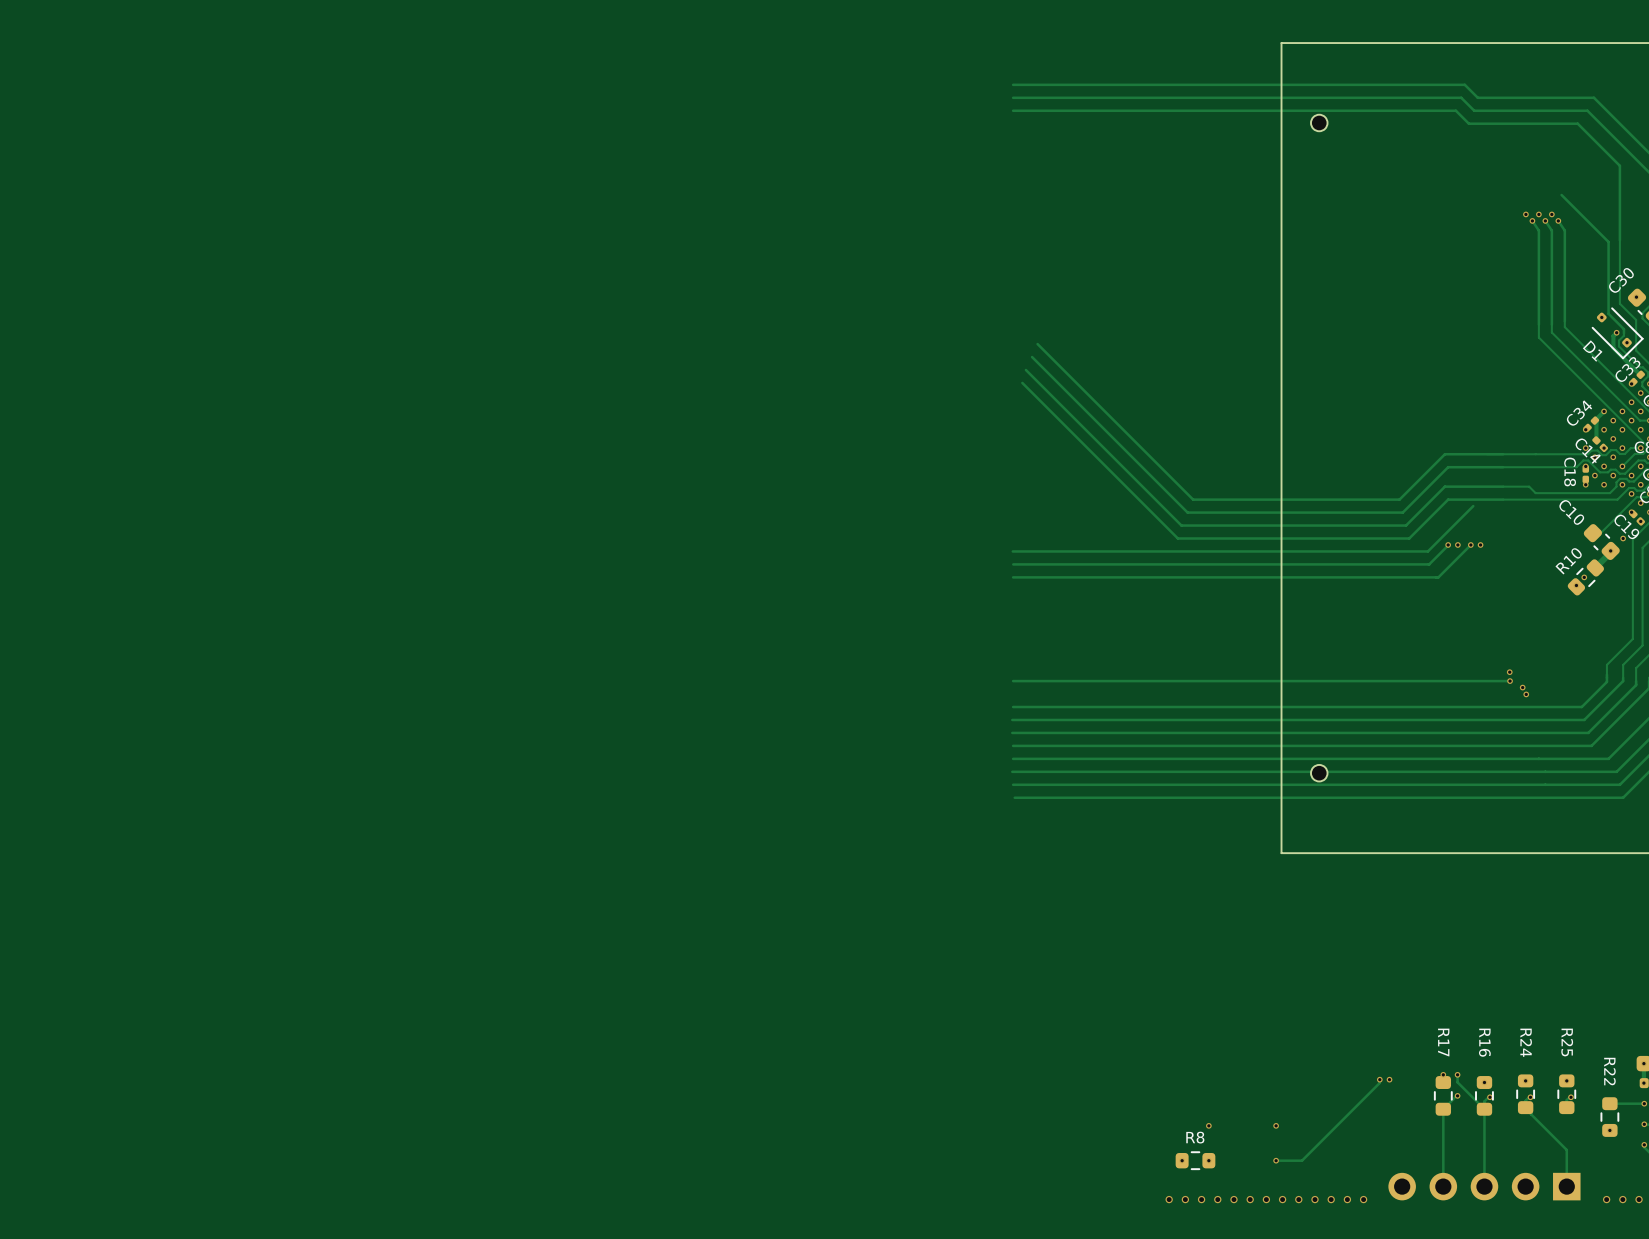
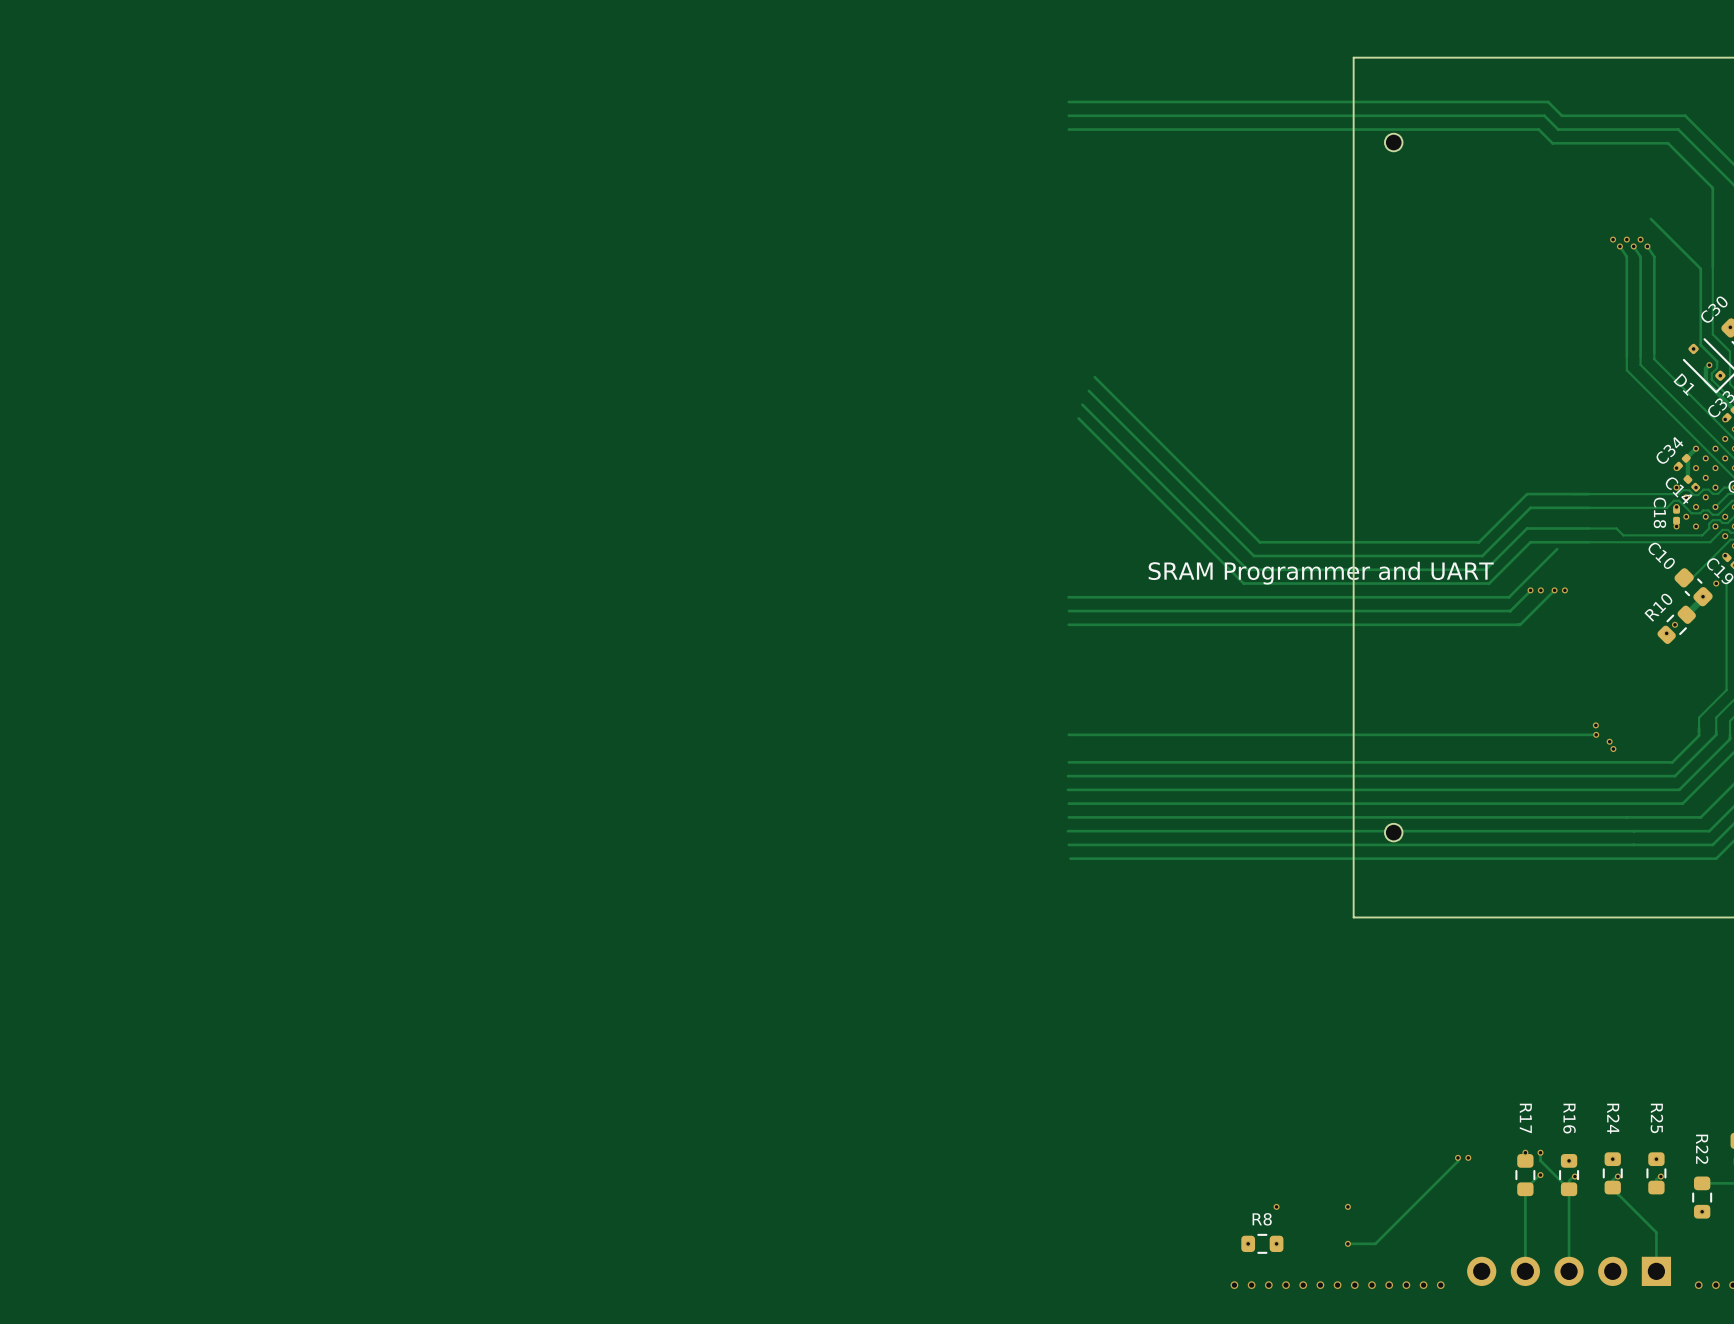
text: none -> SRAM Programmer and UART (1321, 573)

